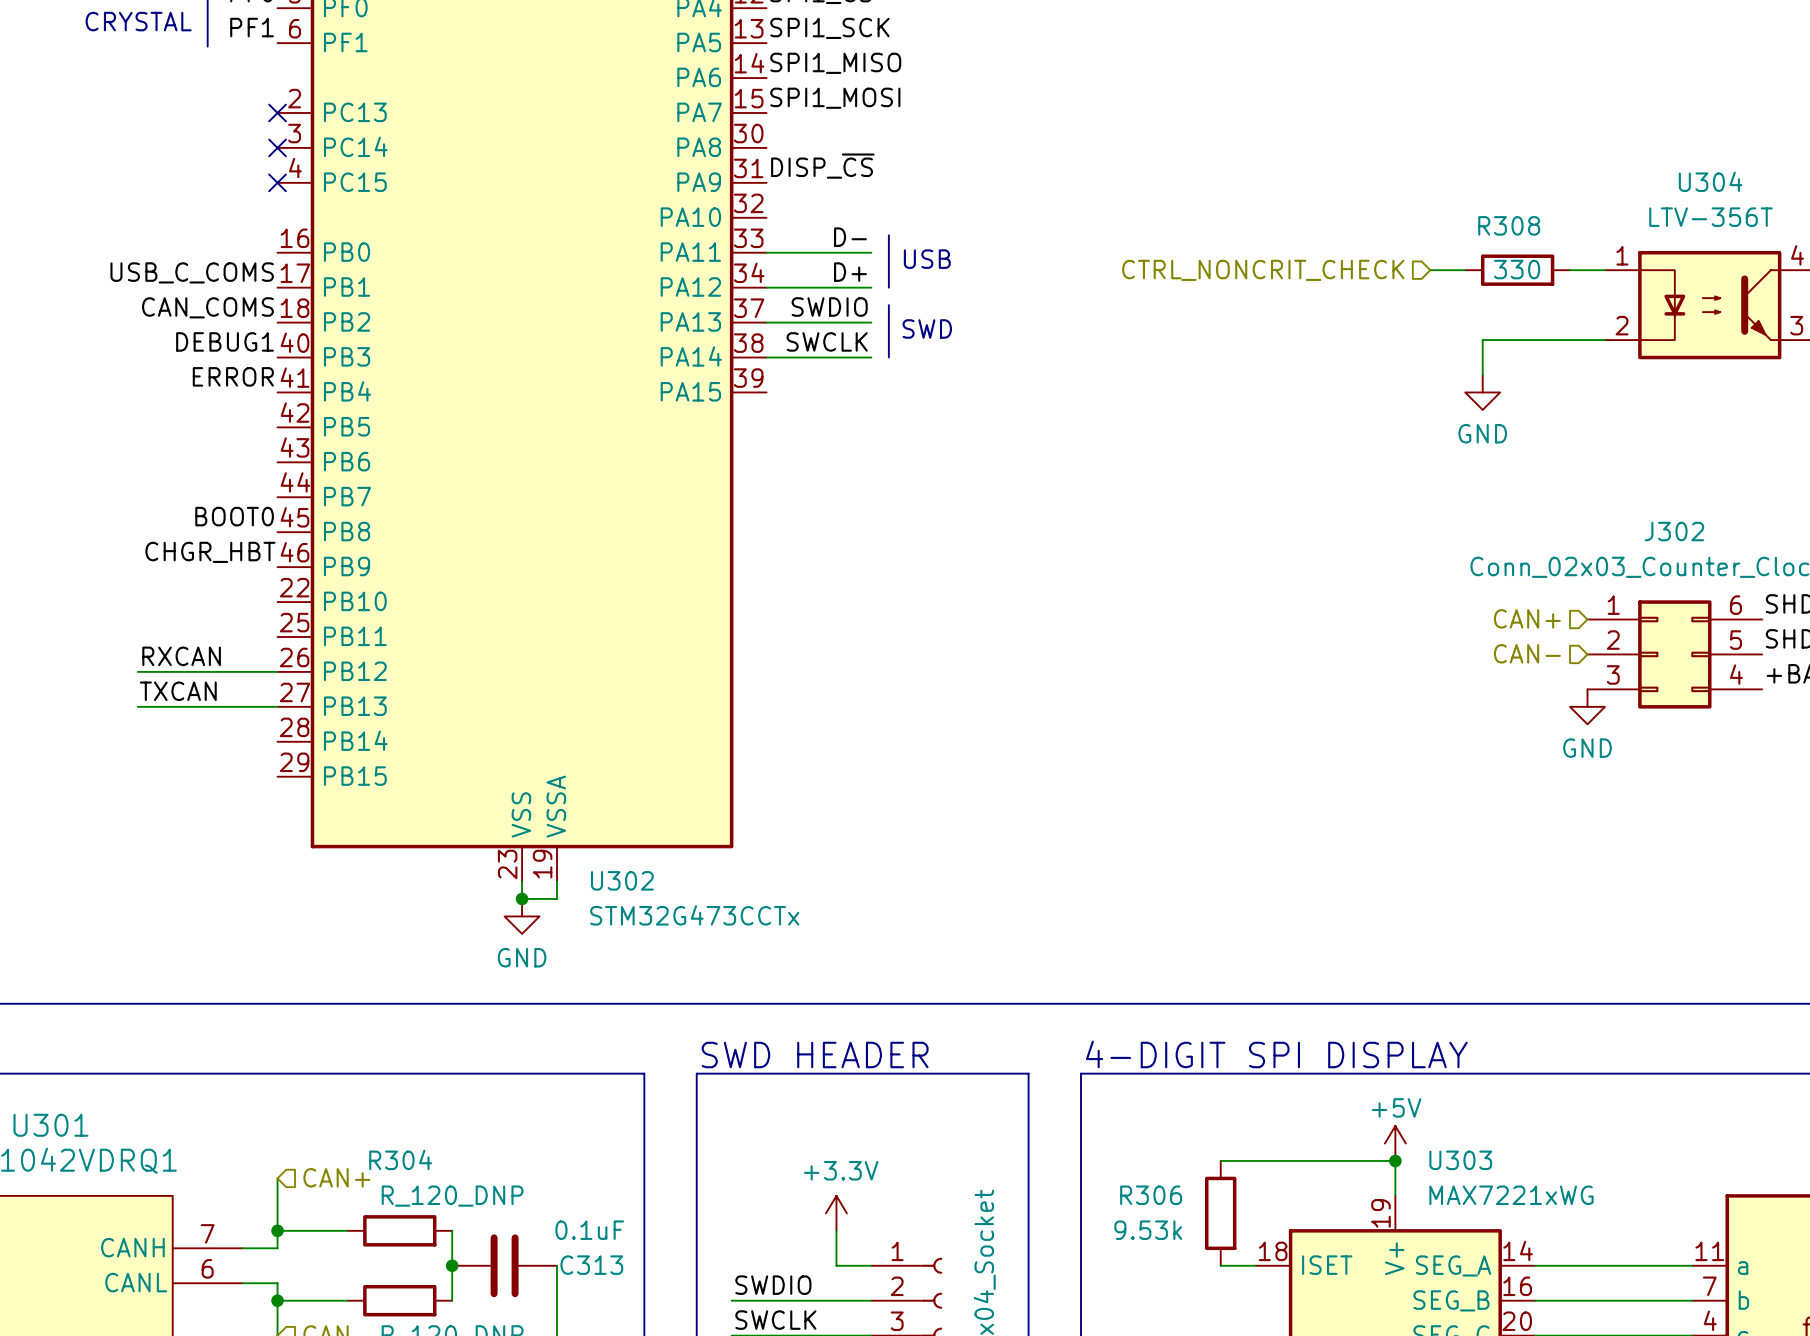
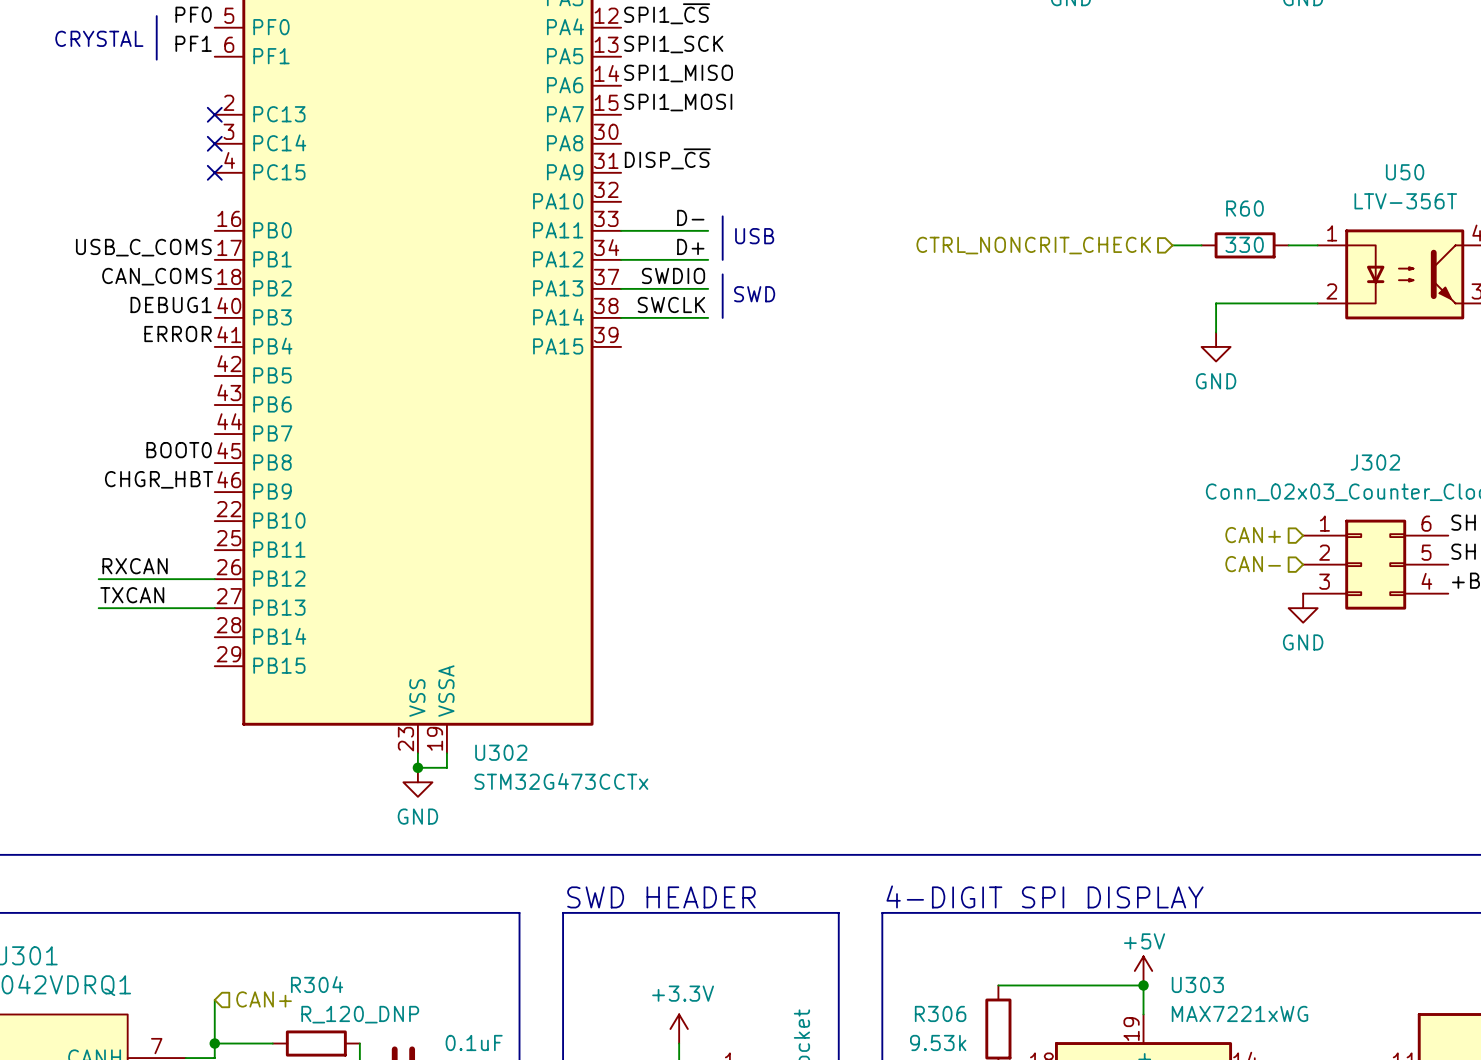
U304 name: U304 (1710, 181) -> U50 (1405, 172)
R308 name: R308 (1509, 225) -> R60 (1244, 208)

